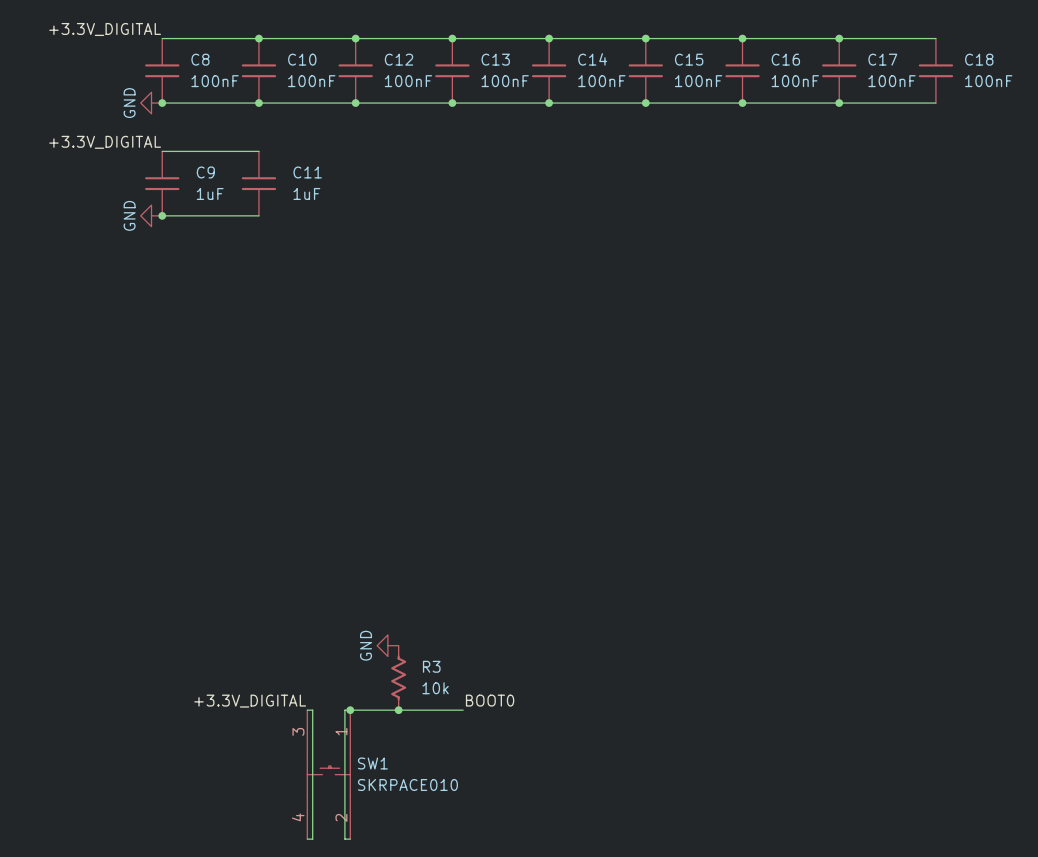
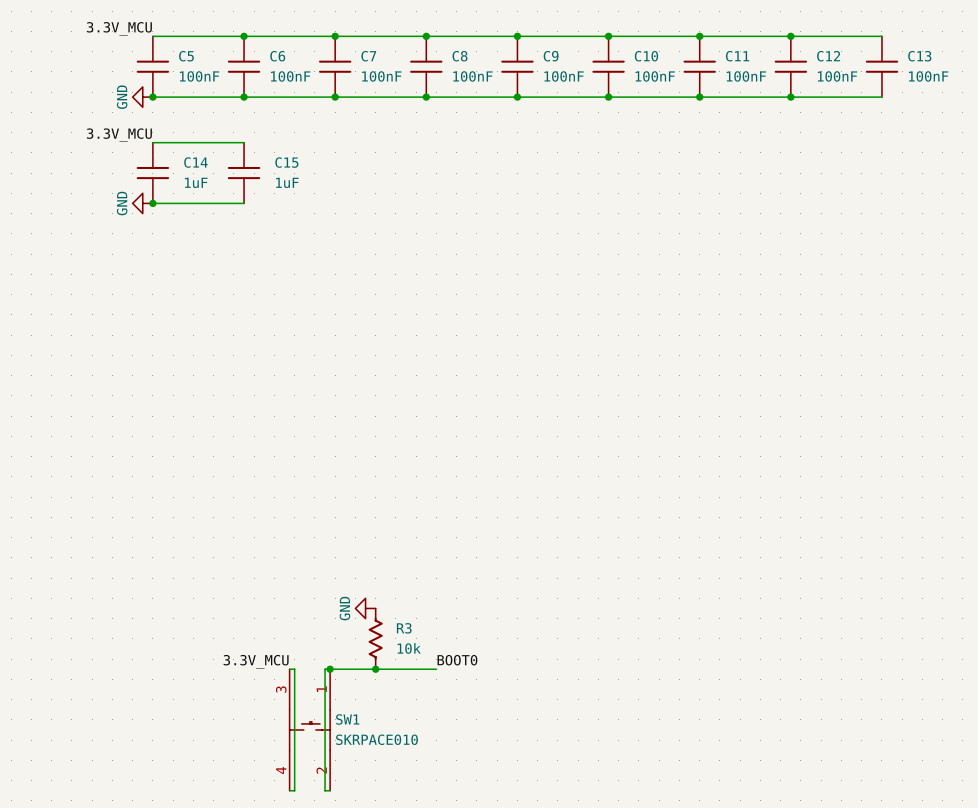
label: +3.3V_DIGITAL (105, 29) -> 3.3V_MCU (119, 28)
C8 name: C8 (200, 59) -> C5 (186, 56)
C10 name: C10 (302, 59) -> C6 (277, 56)
C12 name: C12 (398, 59) -> C7 (368, 56)
C13 name: C13 (495, 59) -> C8 (460, 56)
C14 name: C14 (592, 59) -> C9 (551, 56)
C15 name: C15 (689, 59) -> C10 (646, 56)
C16 name: C16 (785, 59) -> C11 (737, 56)
C17 name: C17 (882, 59) -> C12 (828, 56)
C18 name: C18 (979, 59) -> C13 (919, 56)
label: +3.3V_DIGITAL (105, 142) -> 3.3V_MCU (119, 135)
C9 name: C9 (205, 172) -> C14 (195, 162)
C11 name: C11 (307, 172) -> C15 (286, 162)
label: +3.3V_DIGITAL (250, 701) -> 3.3V_MCU (256, 661)

